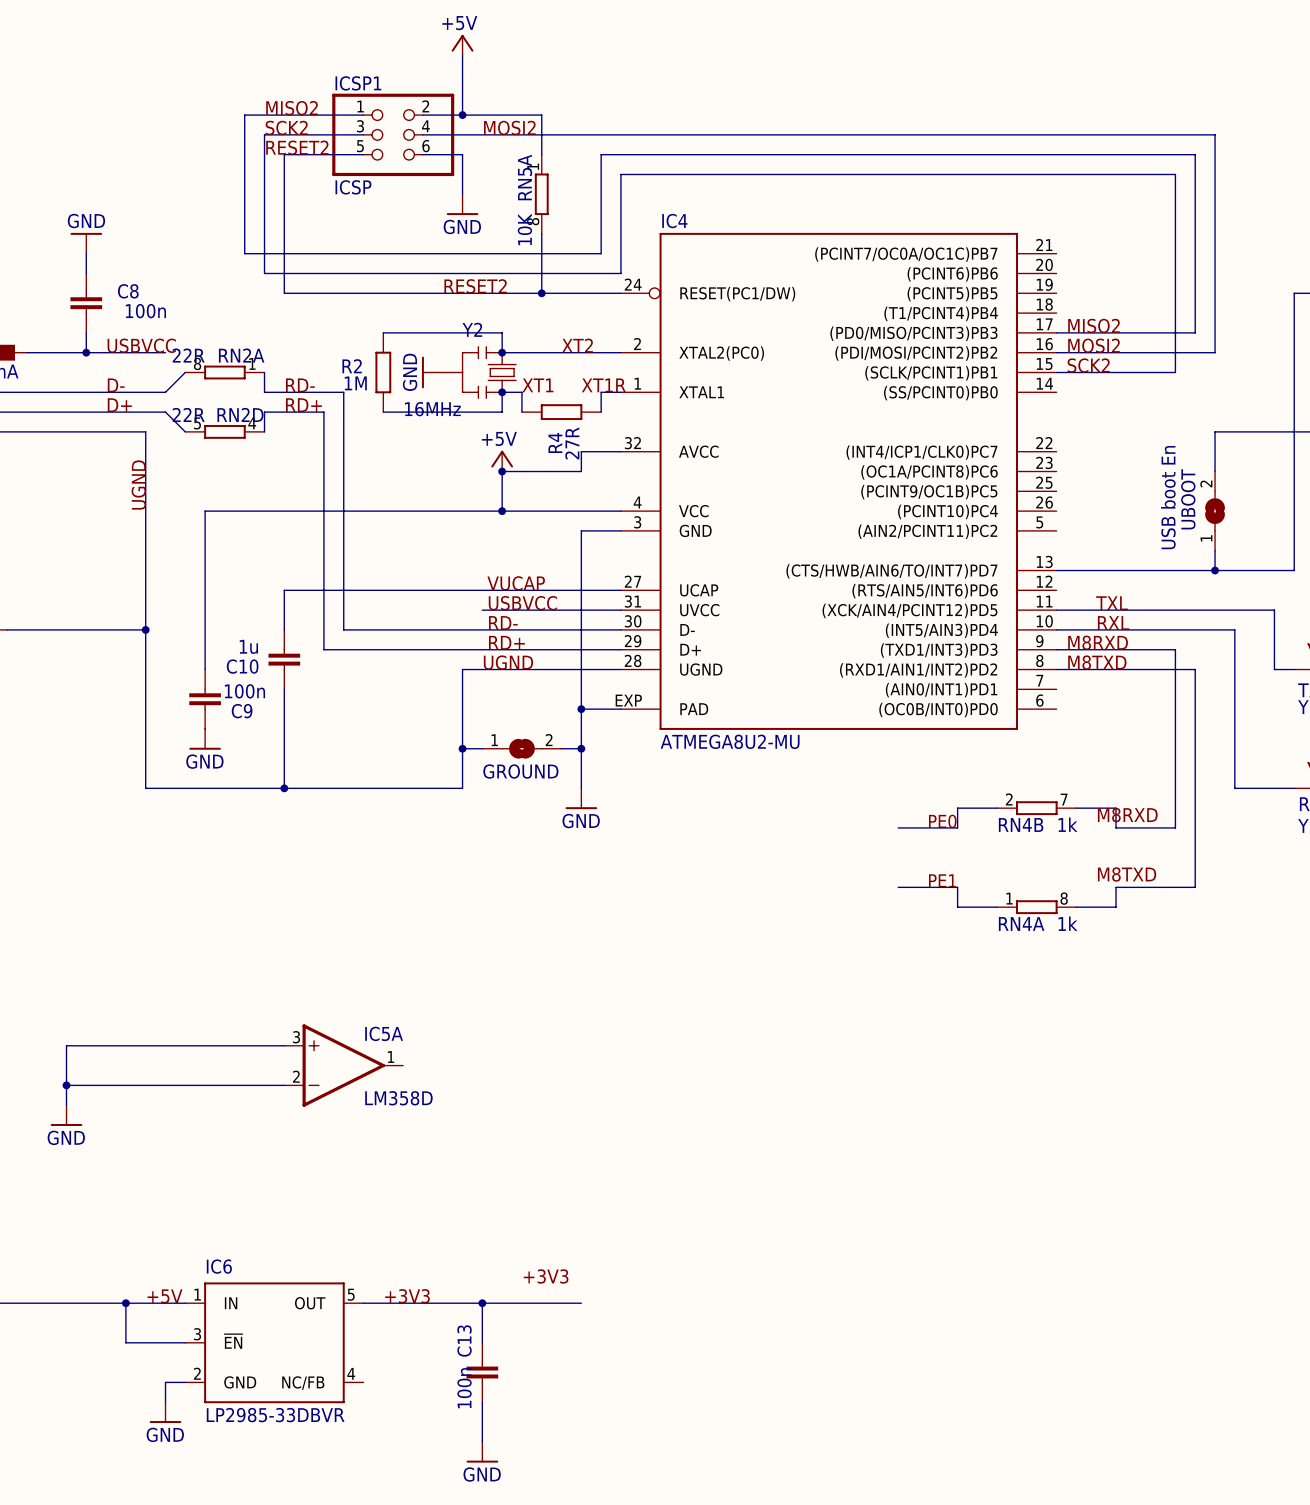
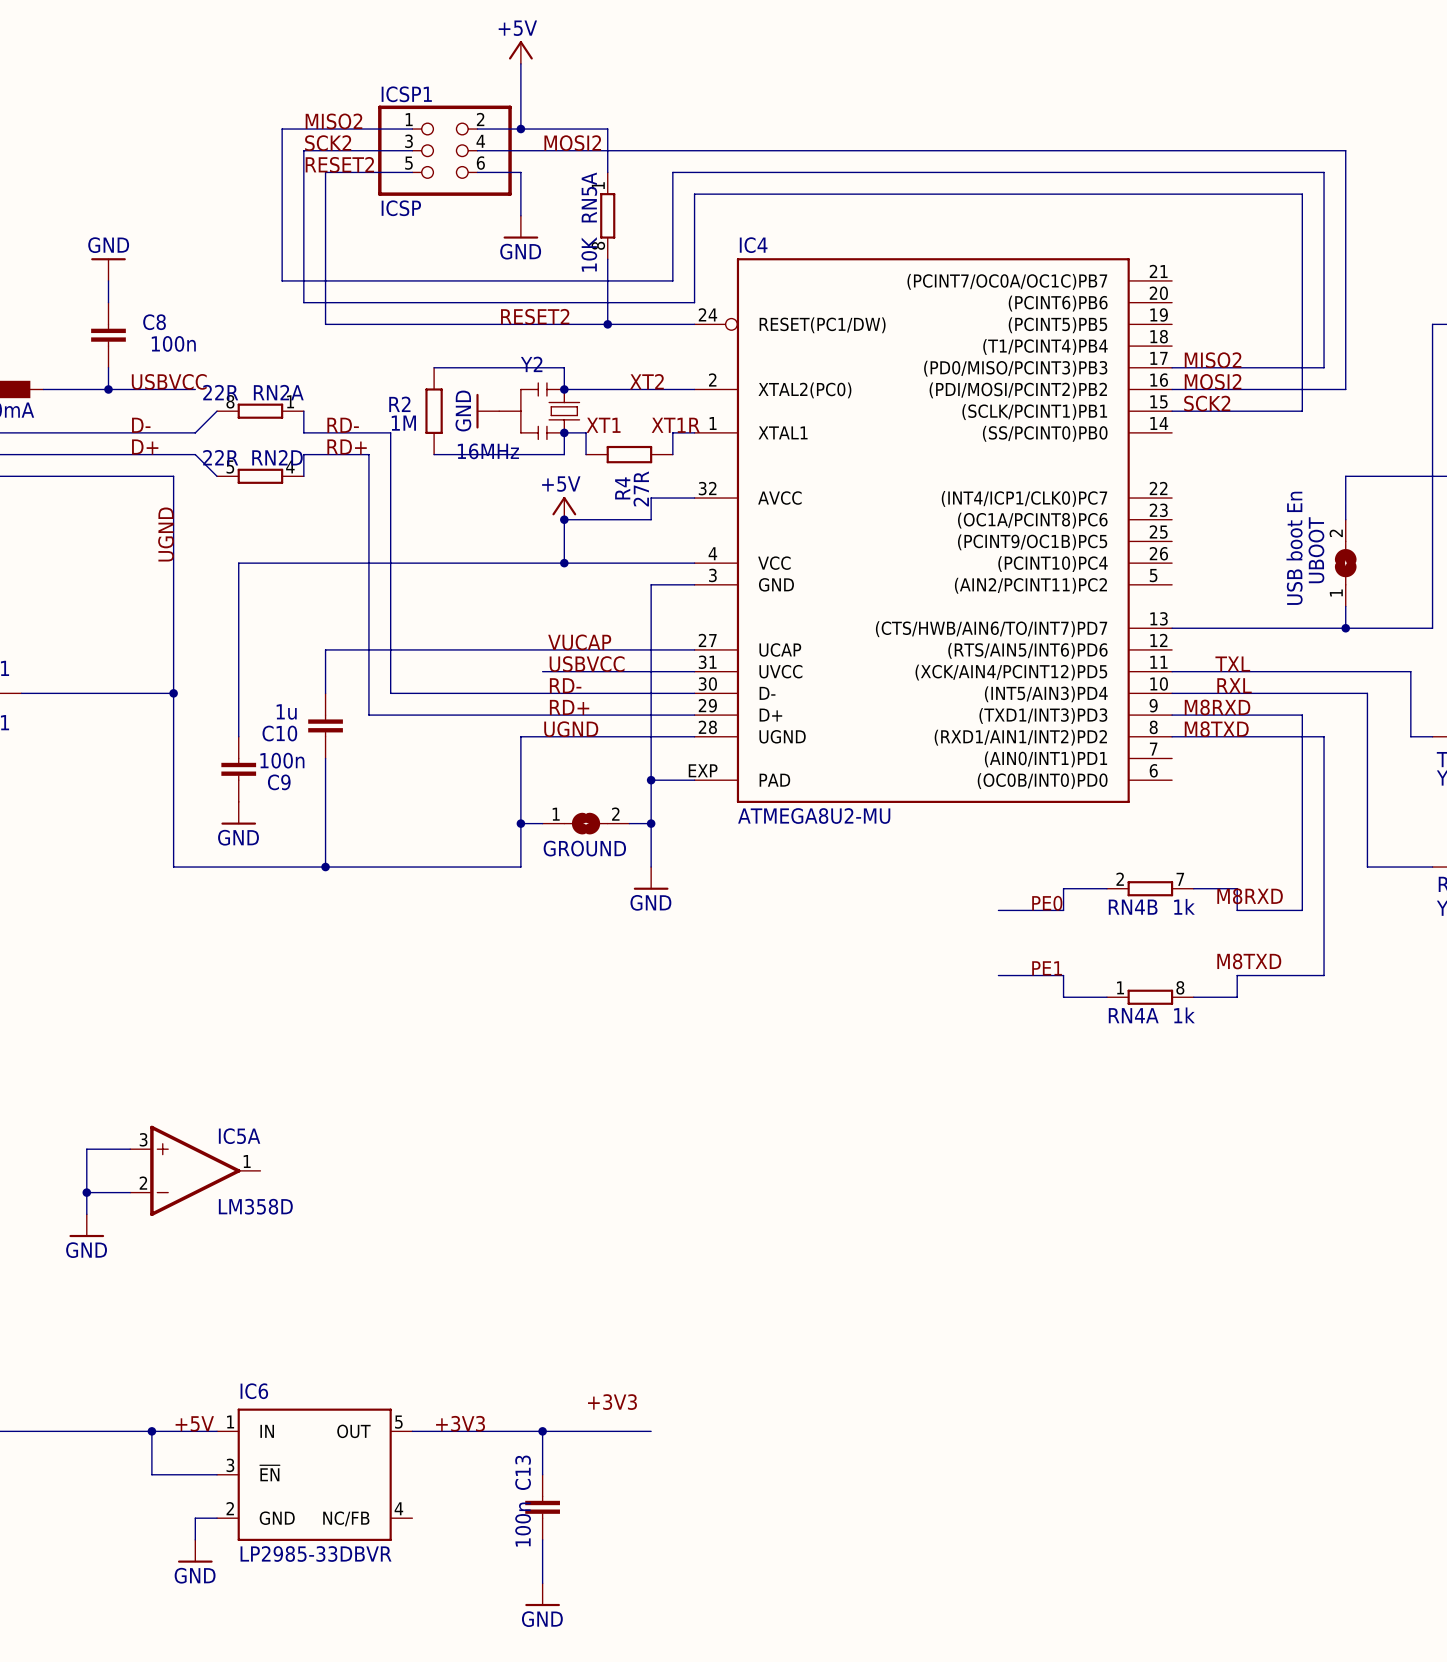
wire: (106, 1045) (284, 1045) -> none
IC5A position: (343, 1065) -> (195, 1170)
wire: (106, 1085) (284, 1085) -> none

